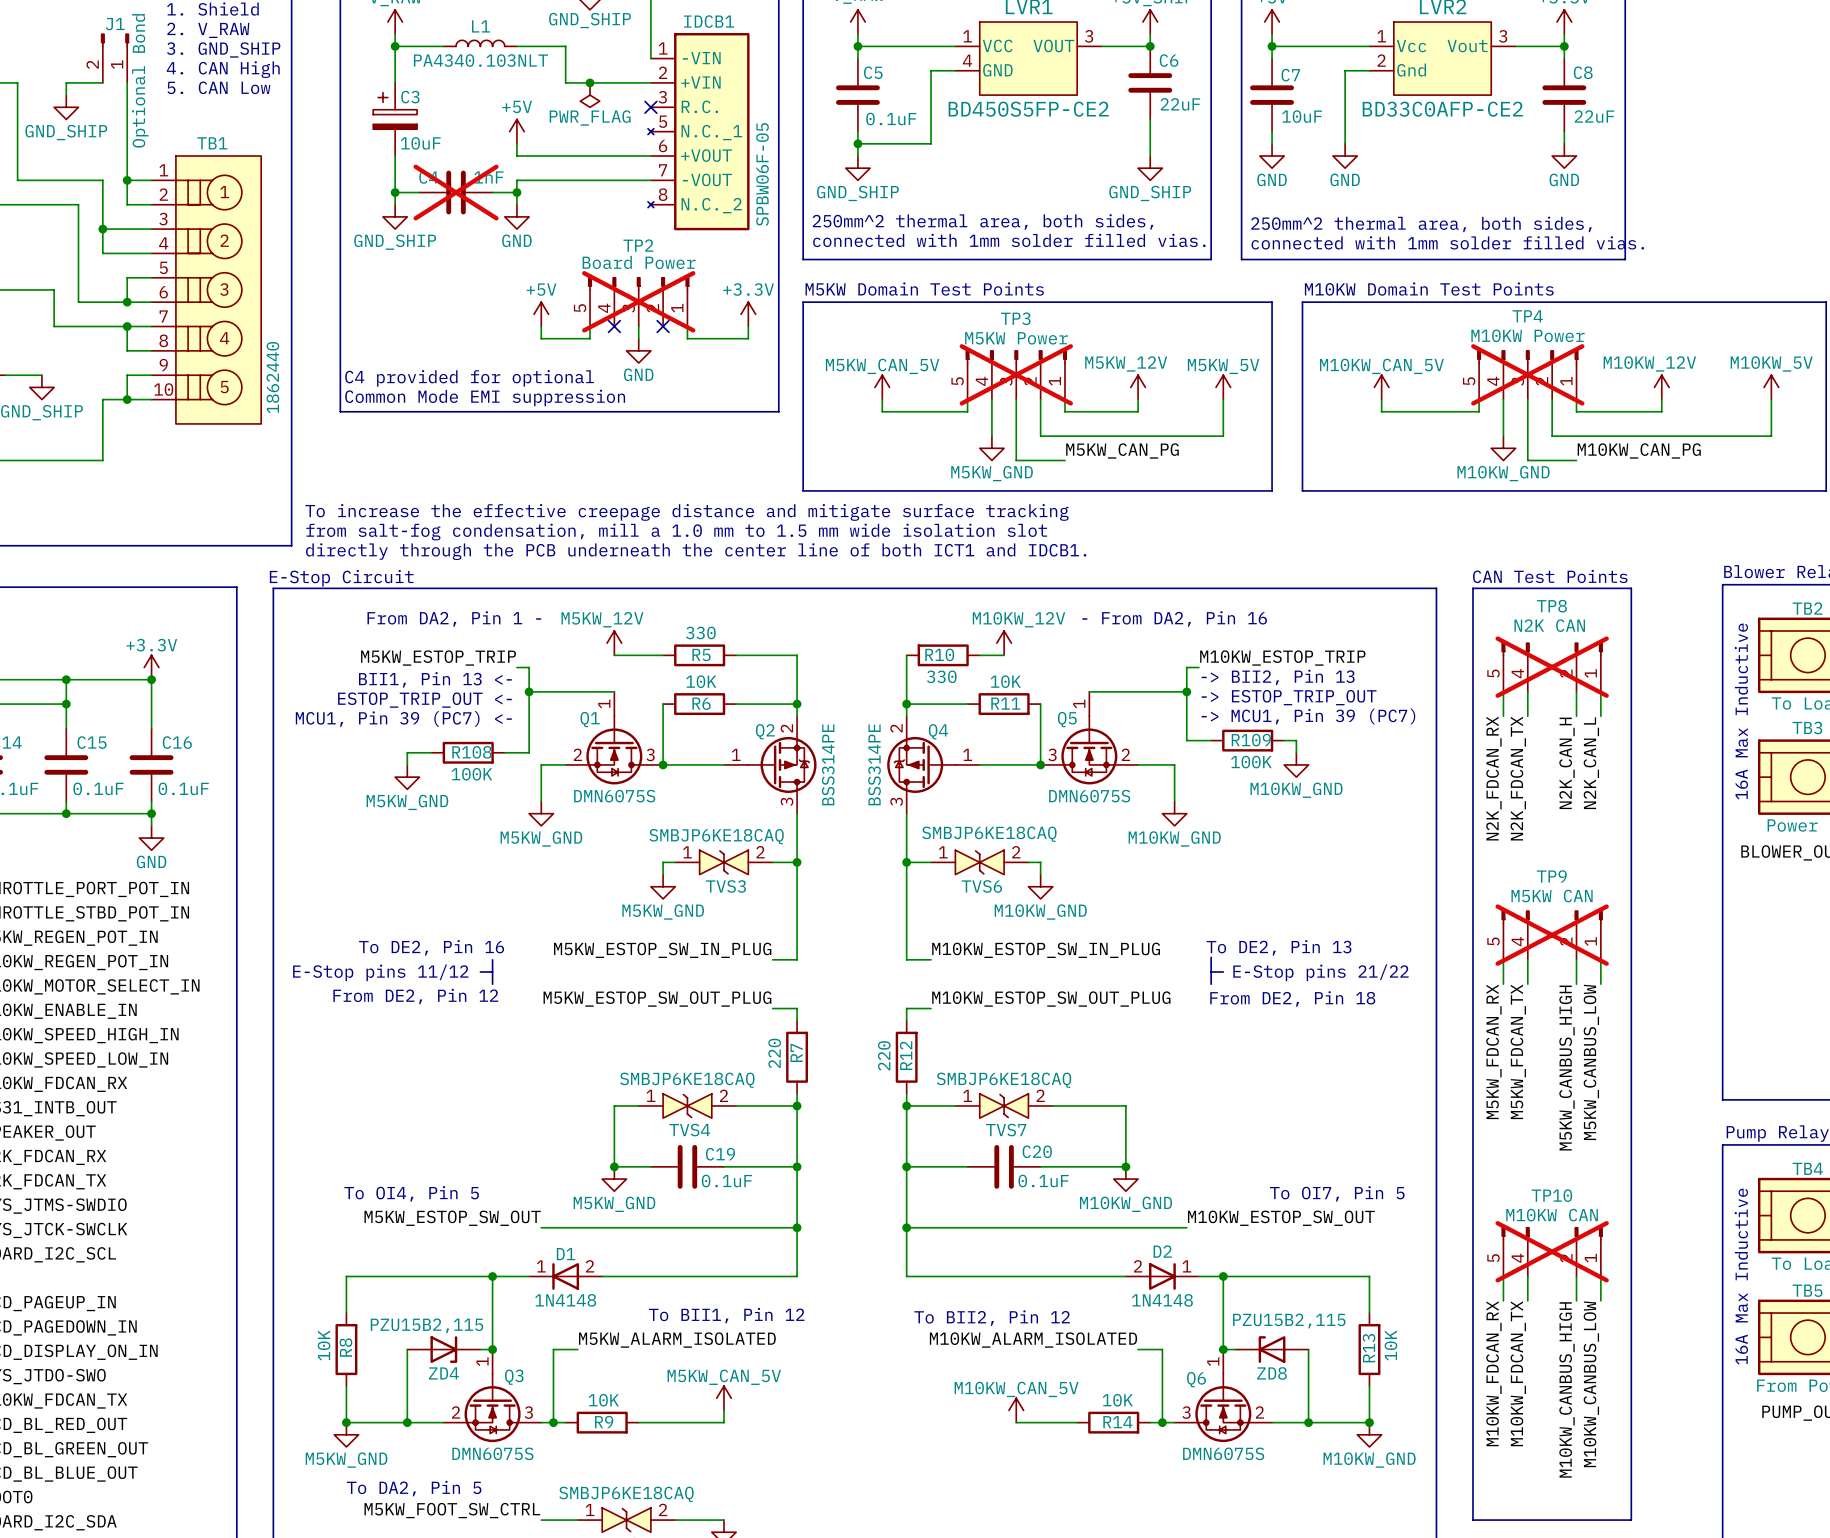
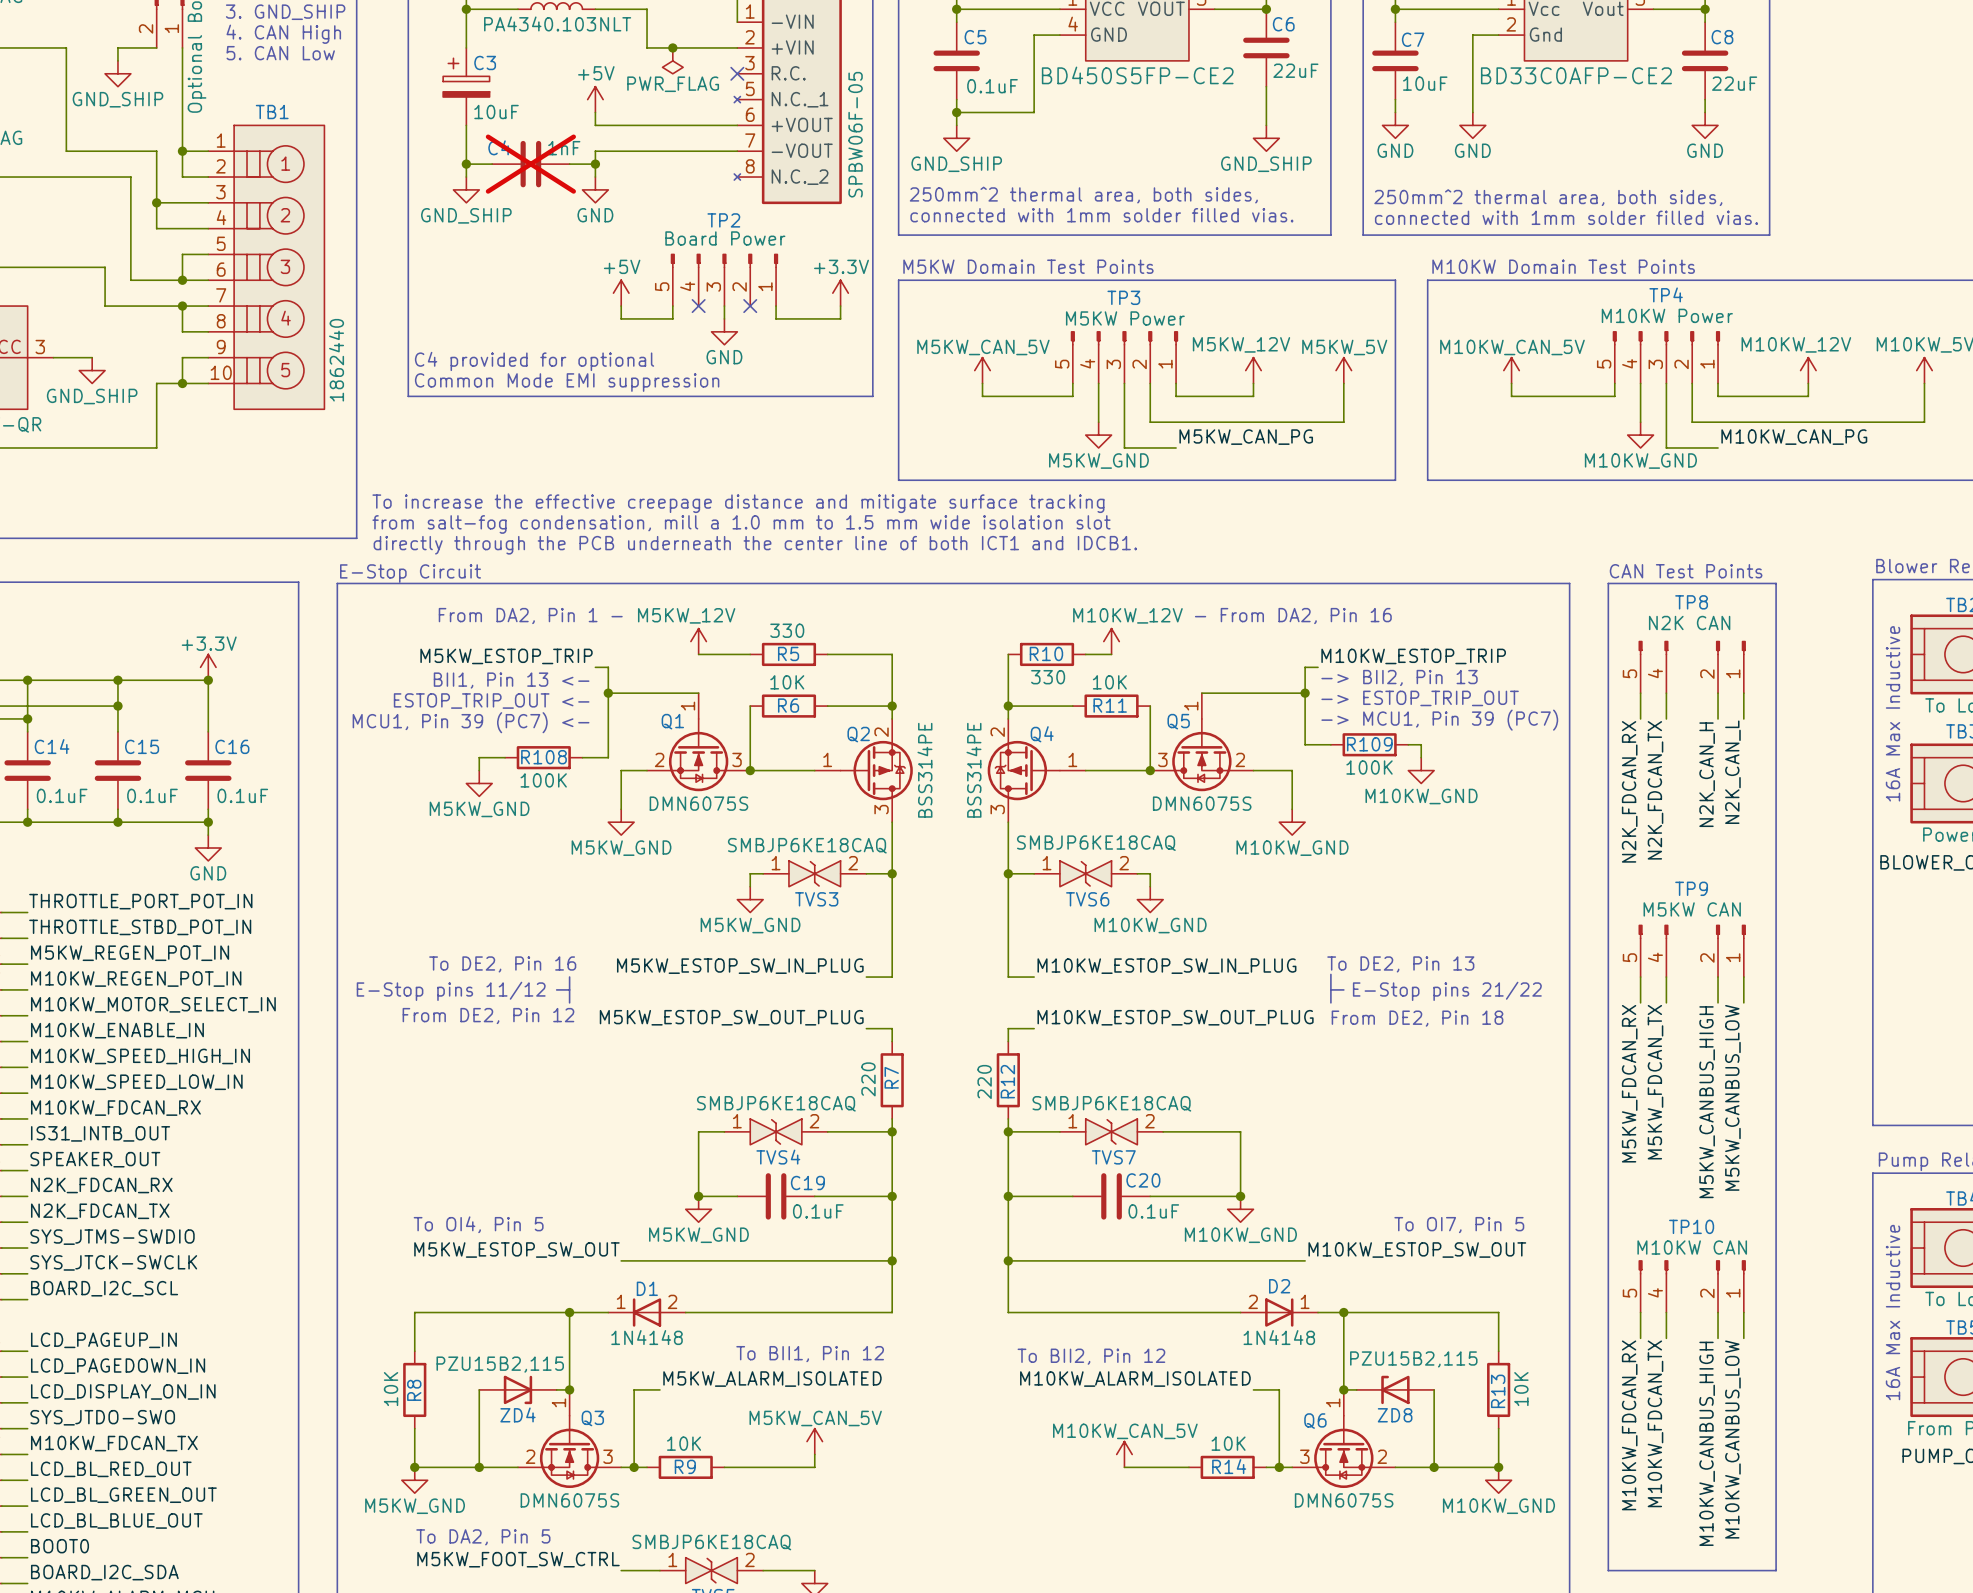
TP2 do-not-place cross: (638, 301) -> none
TP3 do-not-place cross: (1016, 374) -> none
TP4 do-not-place cross: (1527, 374) -> none
TP8 do-not-place cross: (1552, 667) -> none
TP9 do-not-place cross: (1552, 935) -> none
TP10 do-not-place cross: (1552, 1251) -> none

